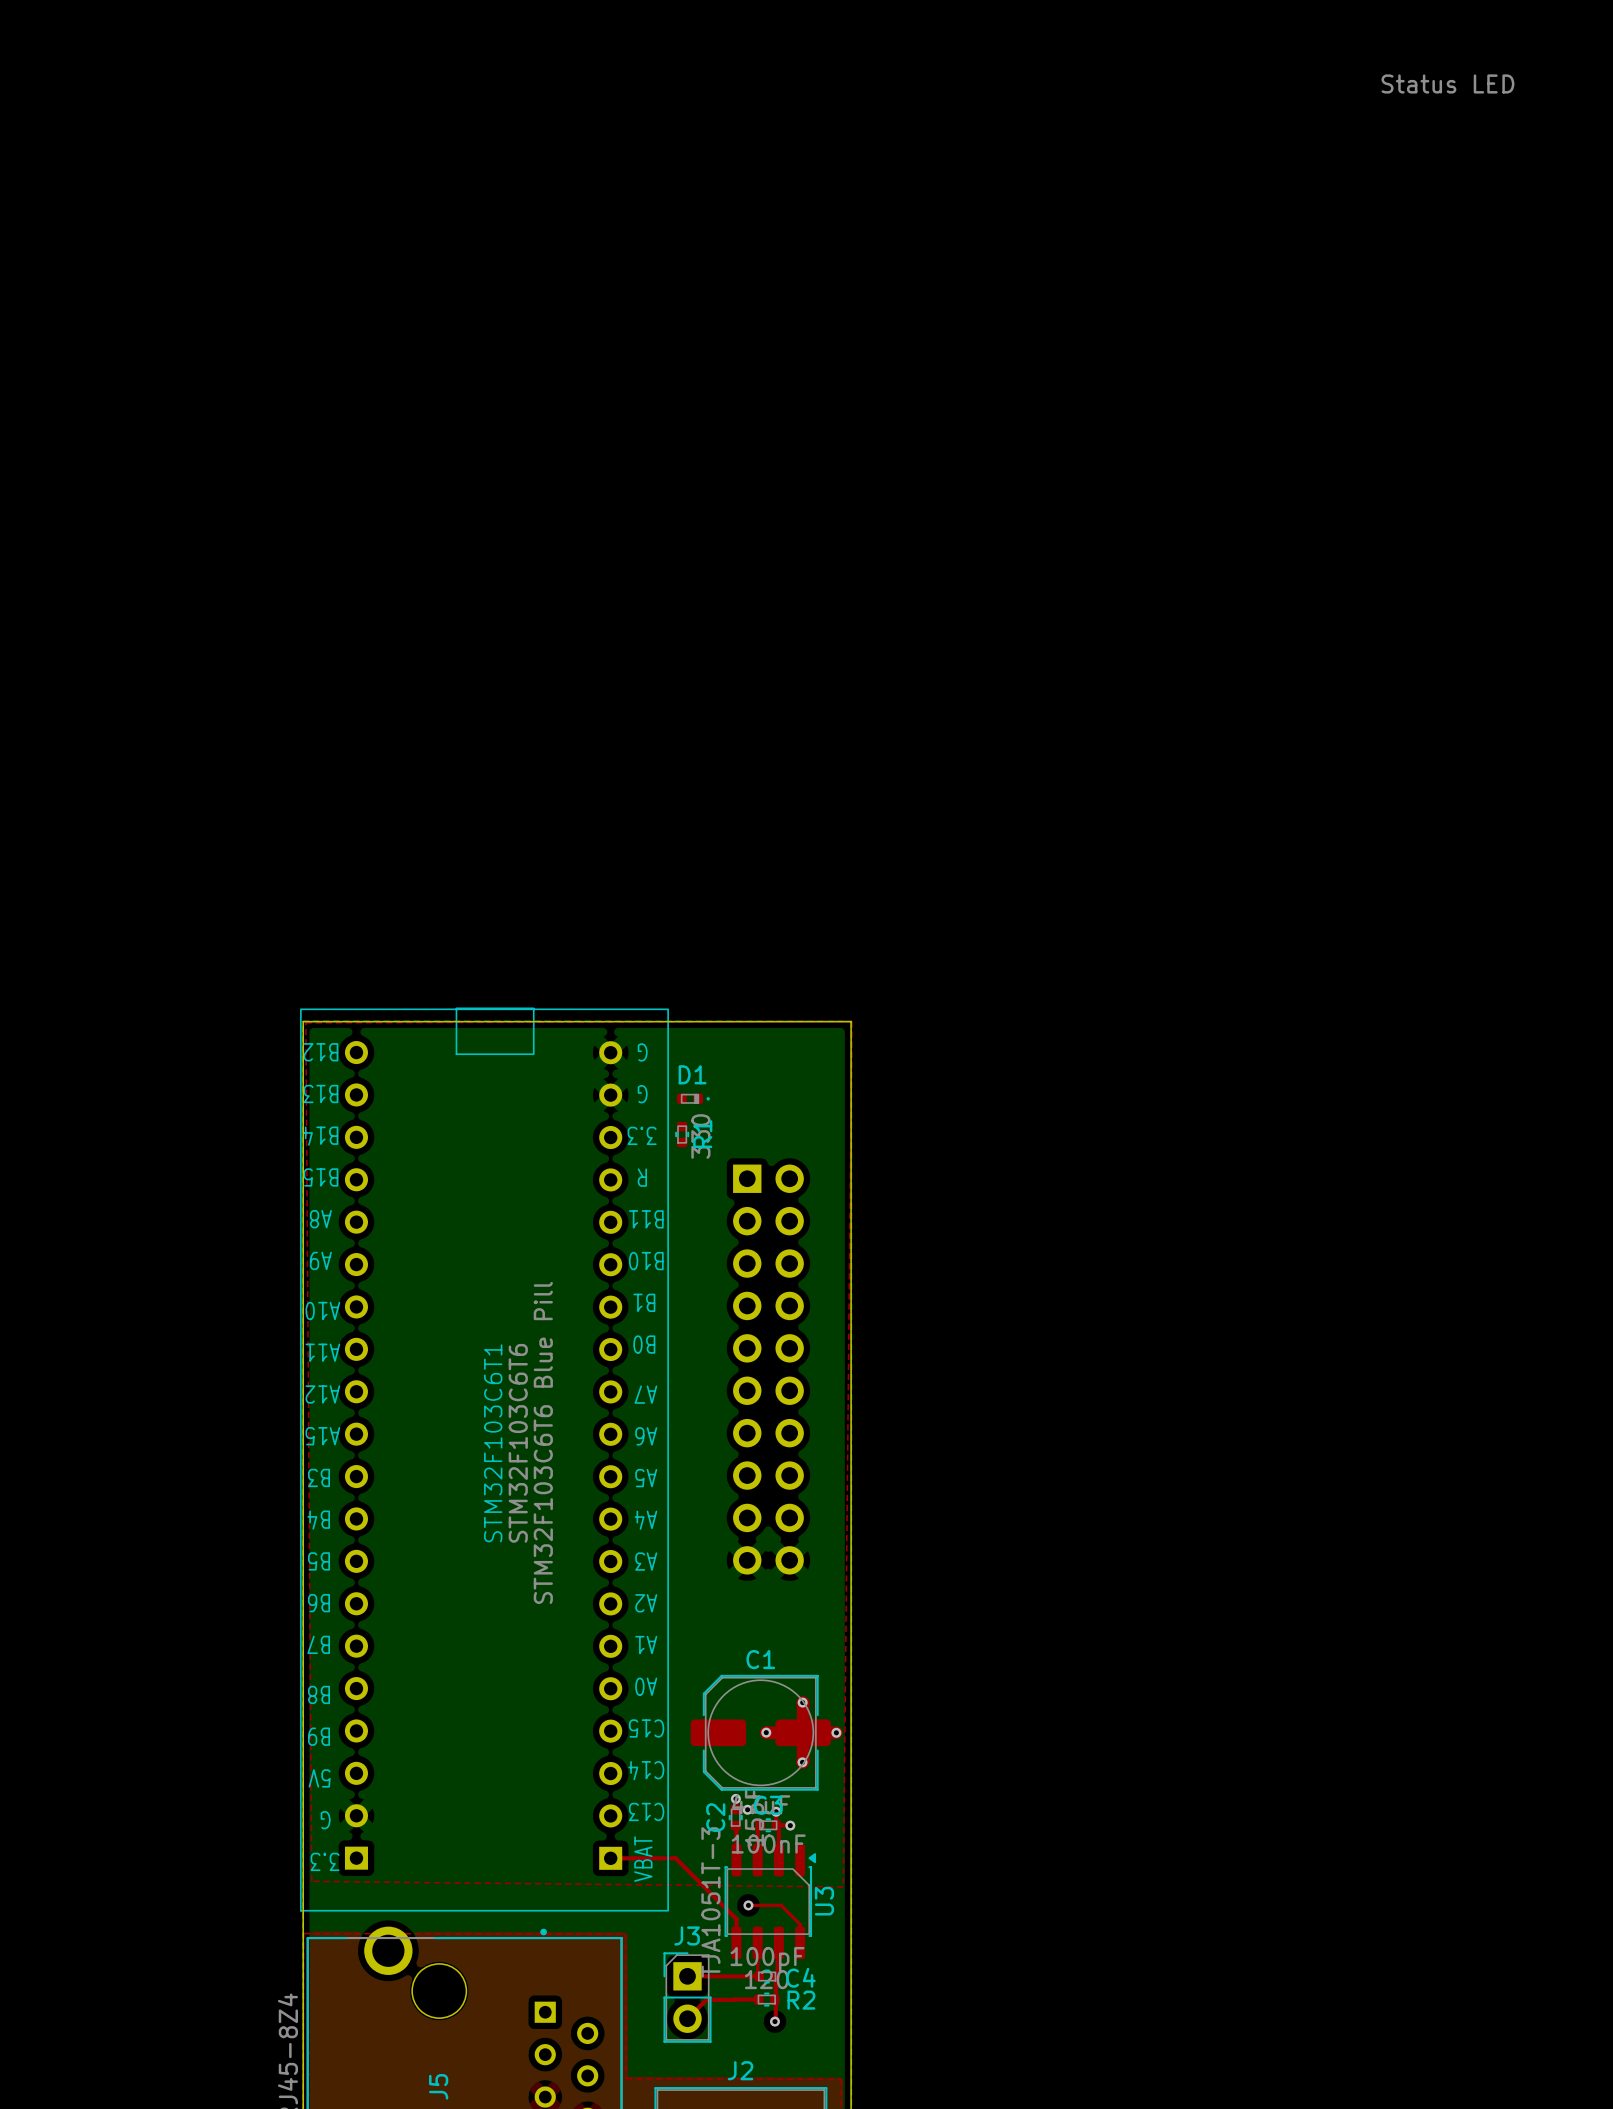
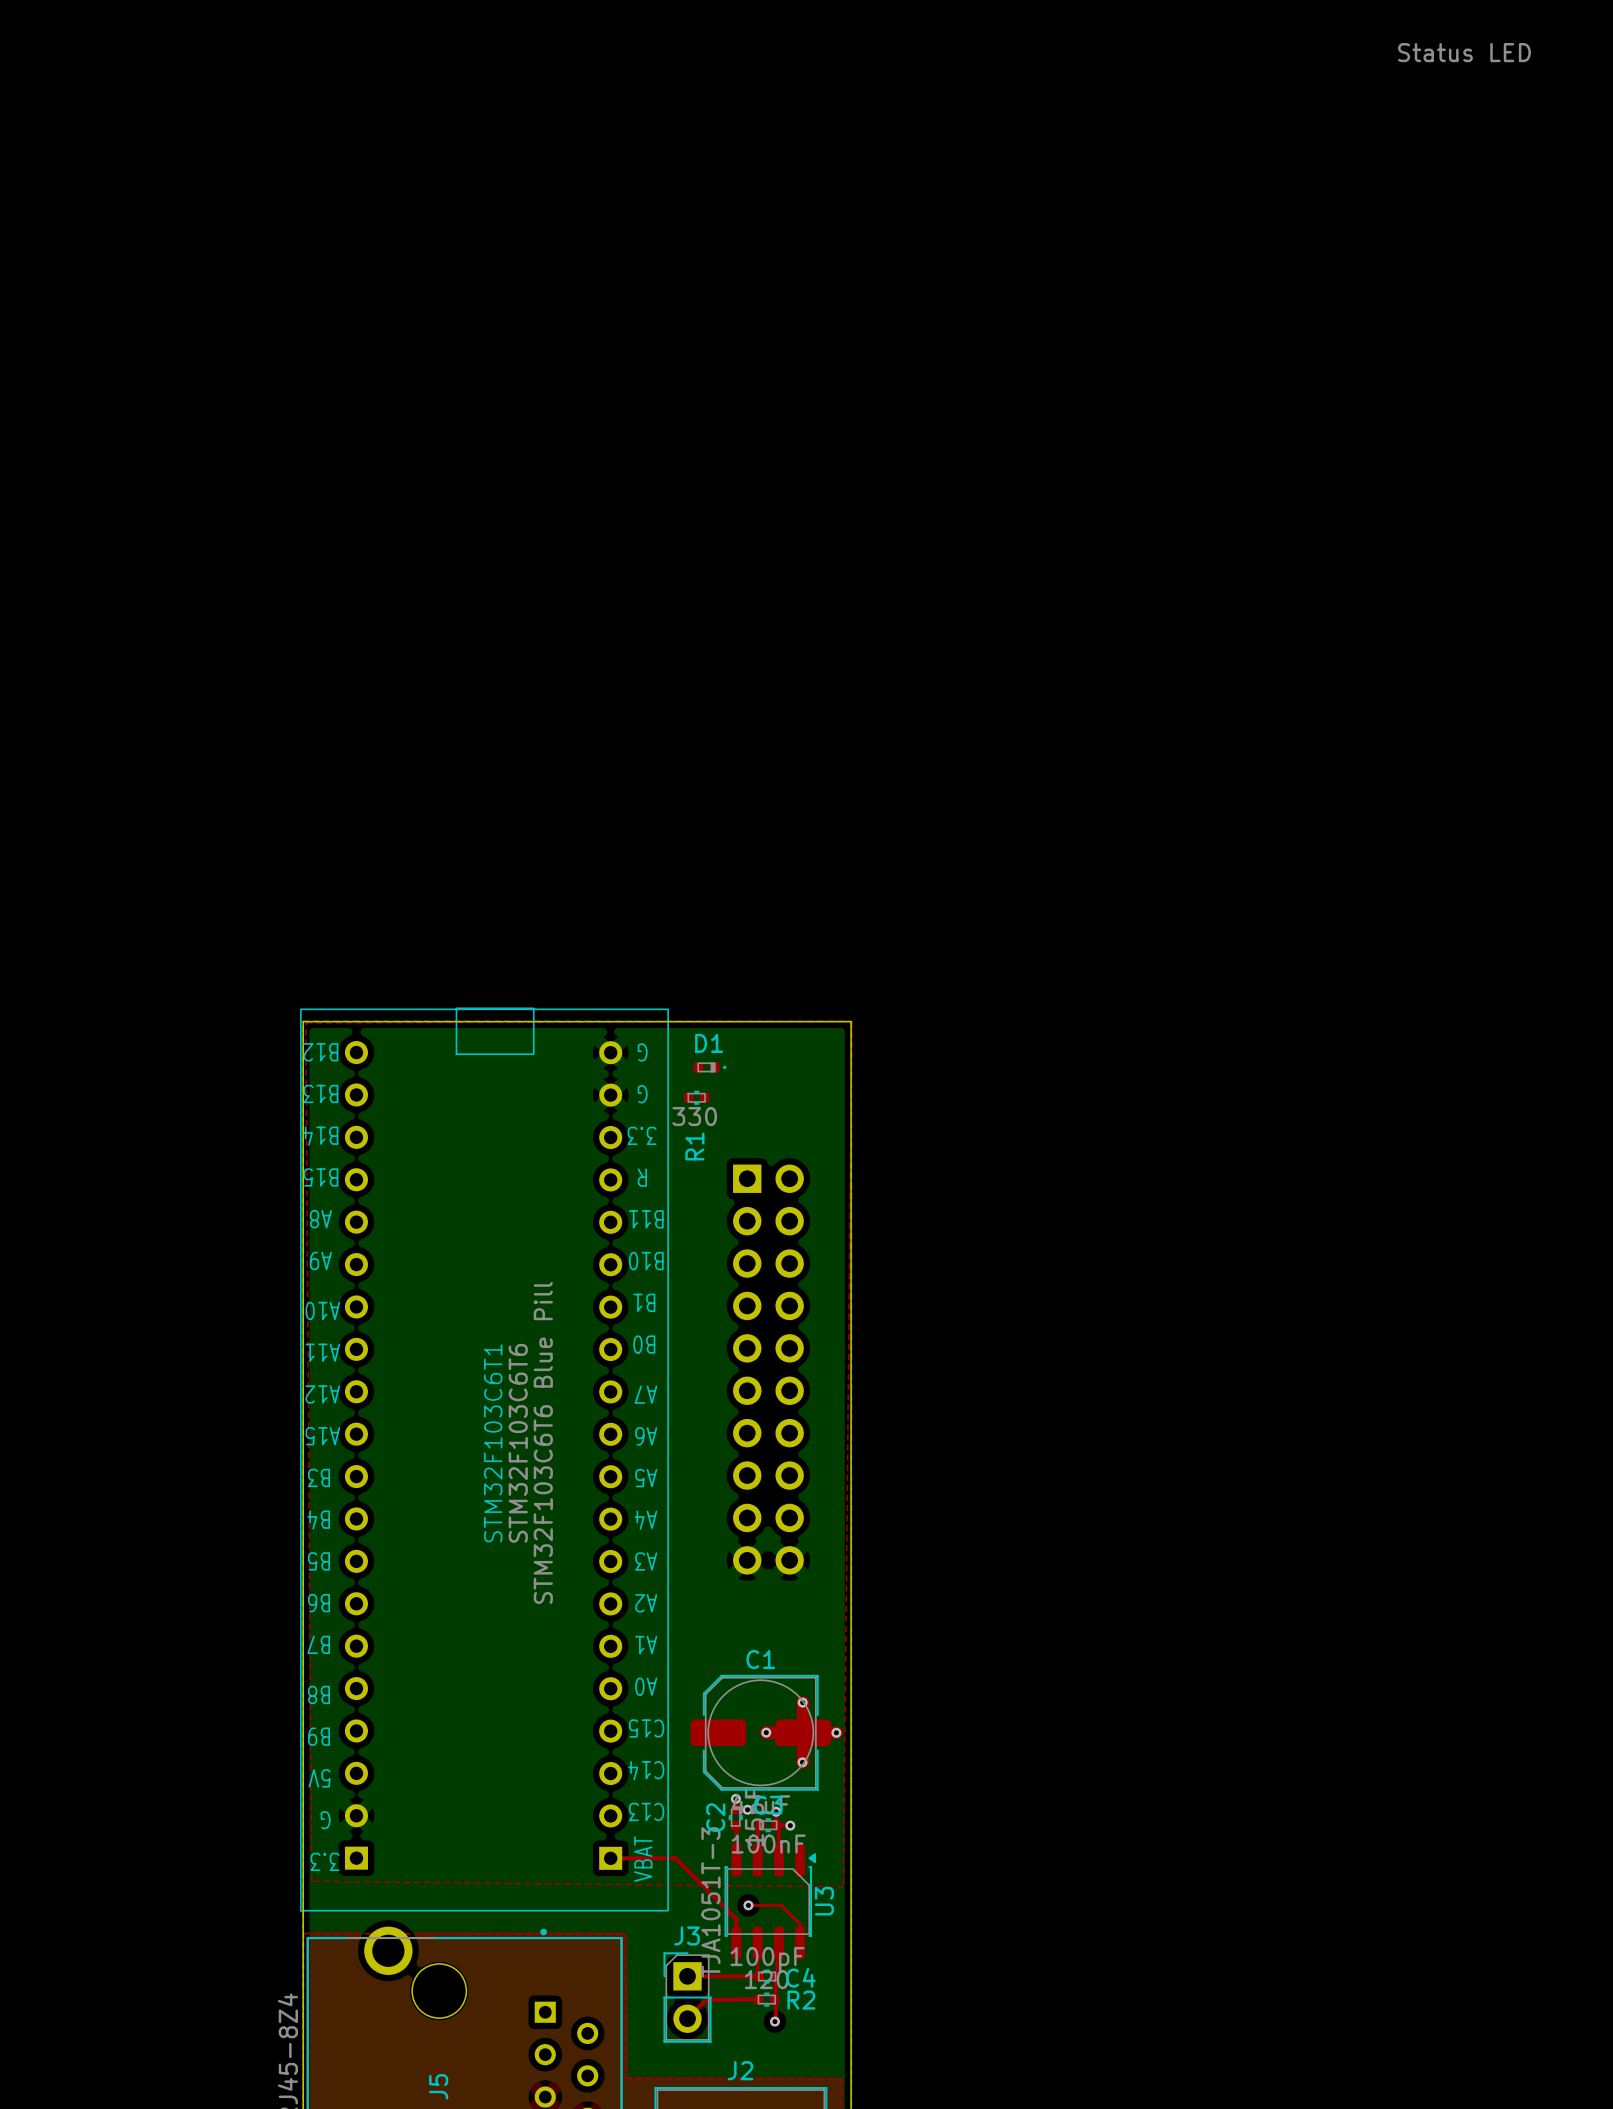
D1 position: (693, 1098) -> (709, 1067)
R1 rotation: 0° (682, 1134) -> 90° clockwise (696, 1097)
R1 position: (682, 1134) -> (696, 1097)

